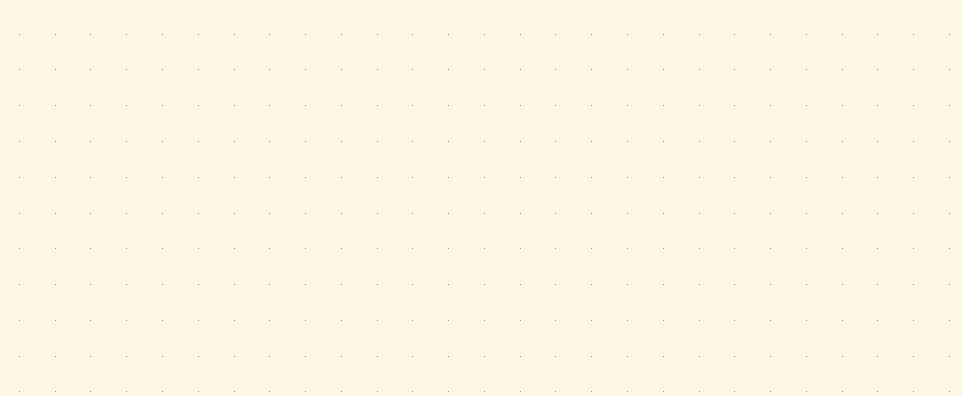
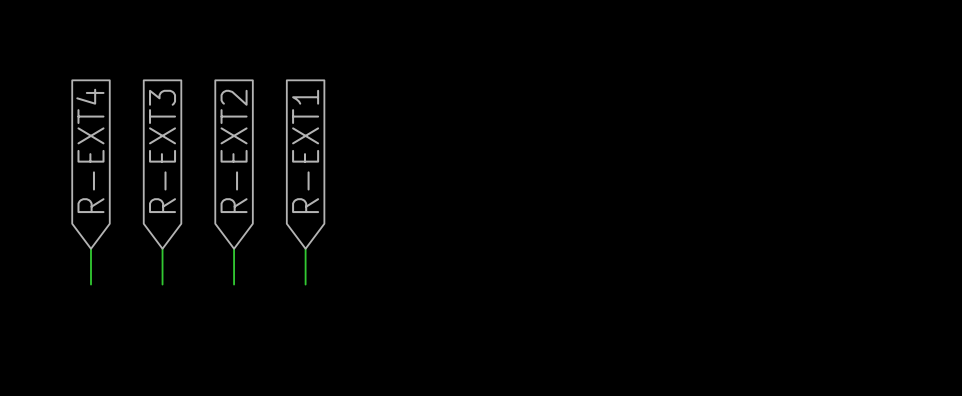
global label: none -> R-EXT4 (90, 150)
global label: none -> R-EXT3 (162, 151)
global label: none -> R-EXT2 (234, 151)
global label: none -> R-EXT1 (305, 151)
wire: none -> (90, 248) (90, 284)
wire: none -> (162, 248) (162, 284)
wire: none -> (234, 248) (234, 284)
wire: none -> (305, 248) (305, 284)

